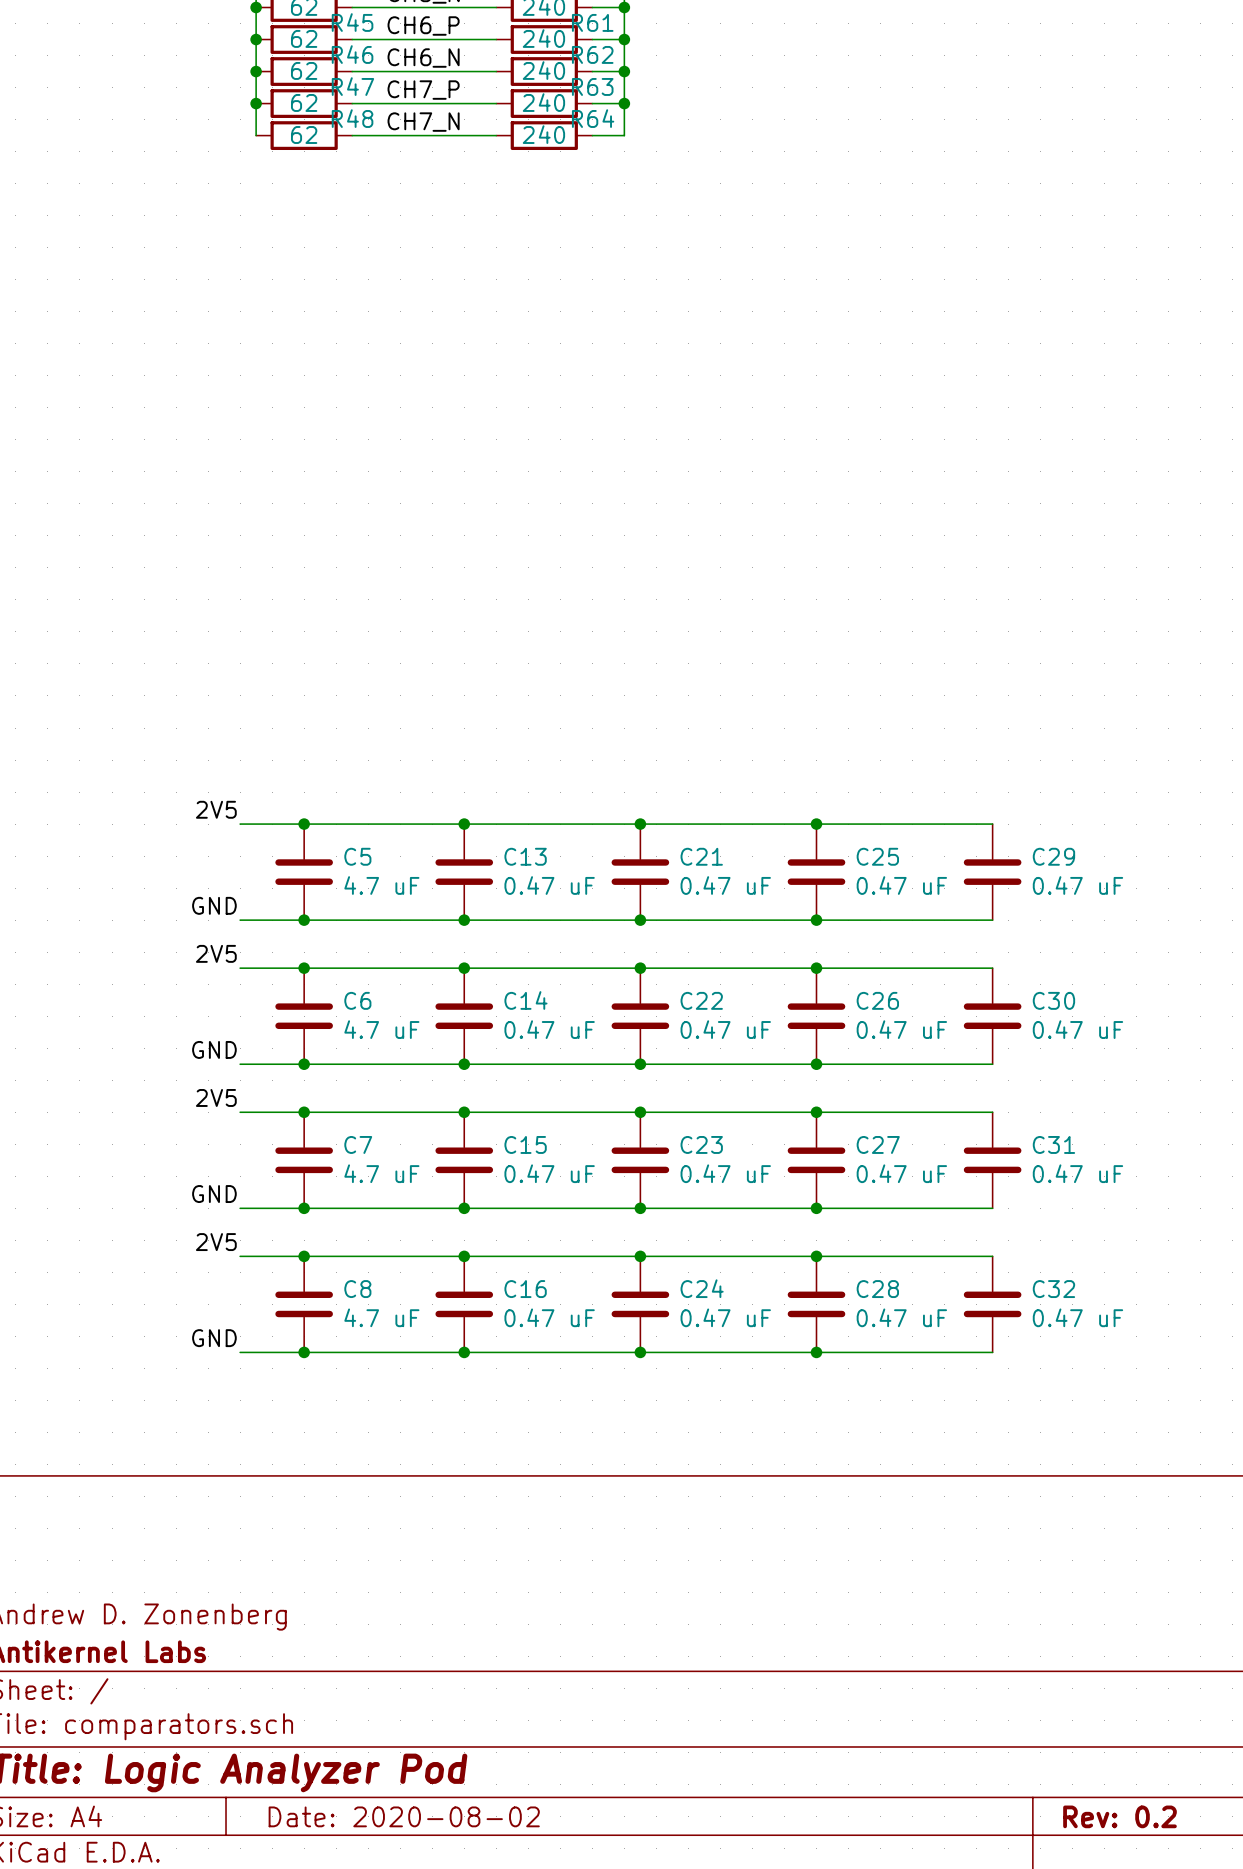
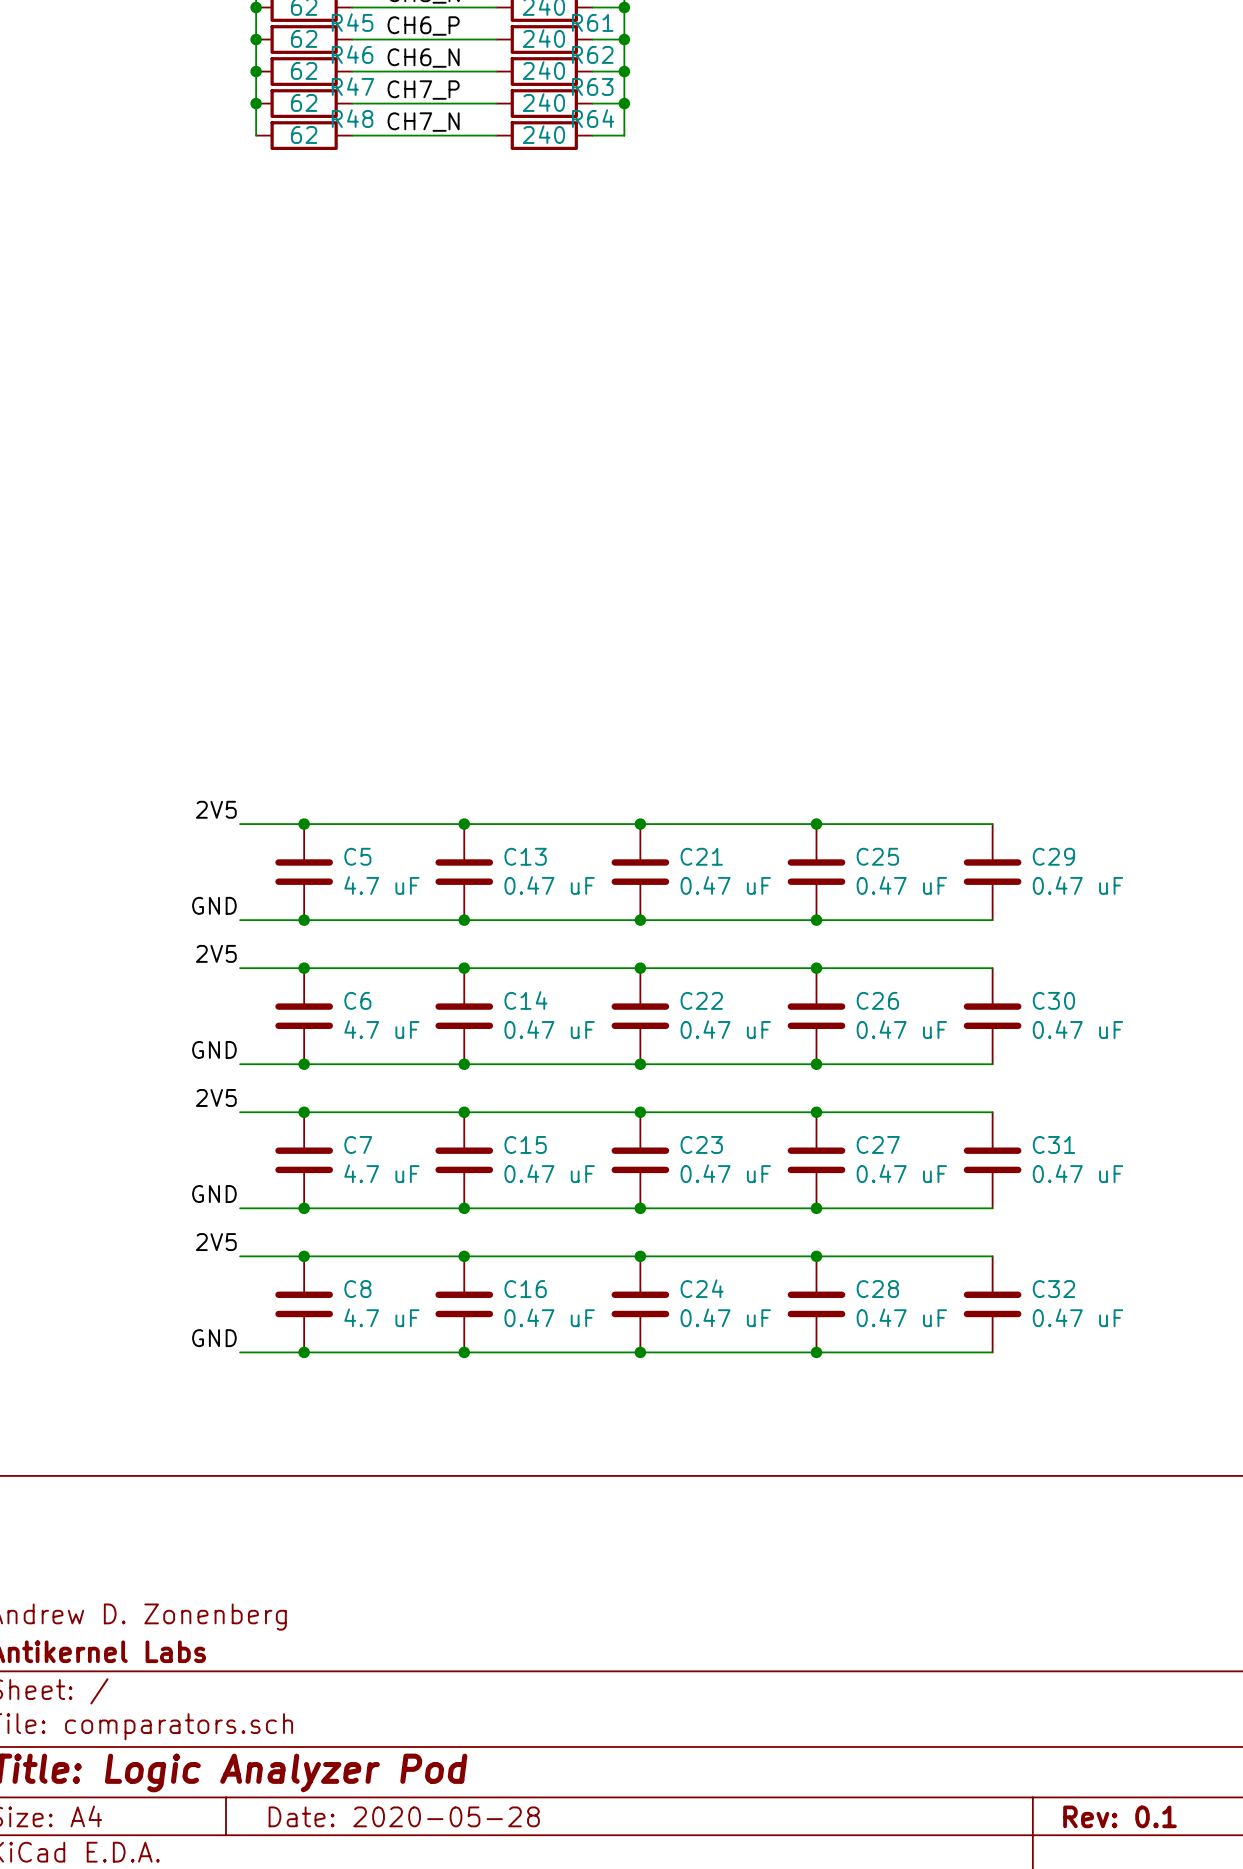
title block: Date: 2020-08-02 (404, 1816) -> Date: 2020-05-28 (404, 1816)
title block: Rev: 0.2 (1119, 1816) -> Rev: 0.1 (1119, 1816)

